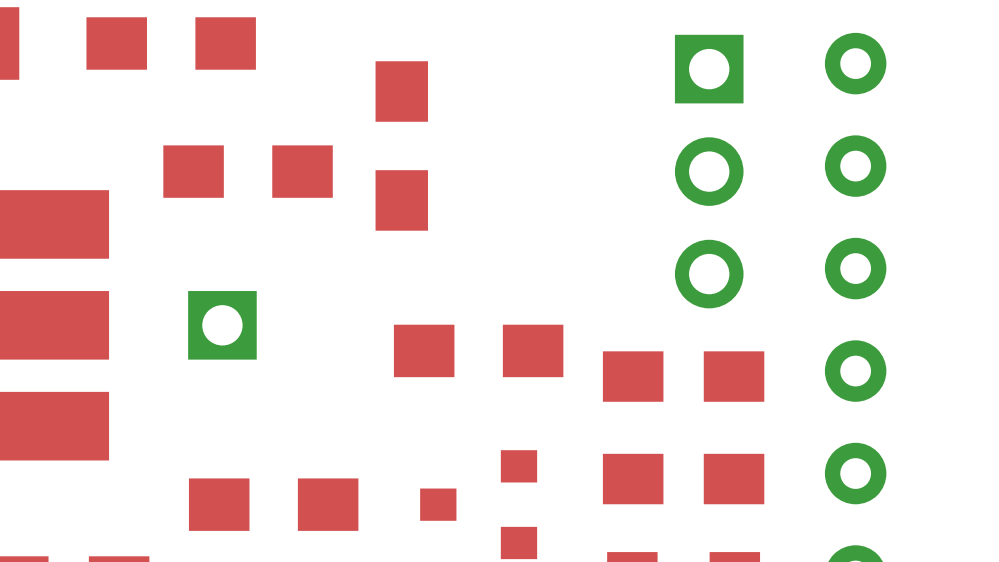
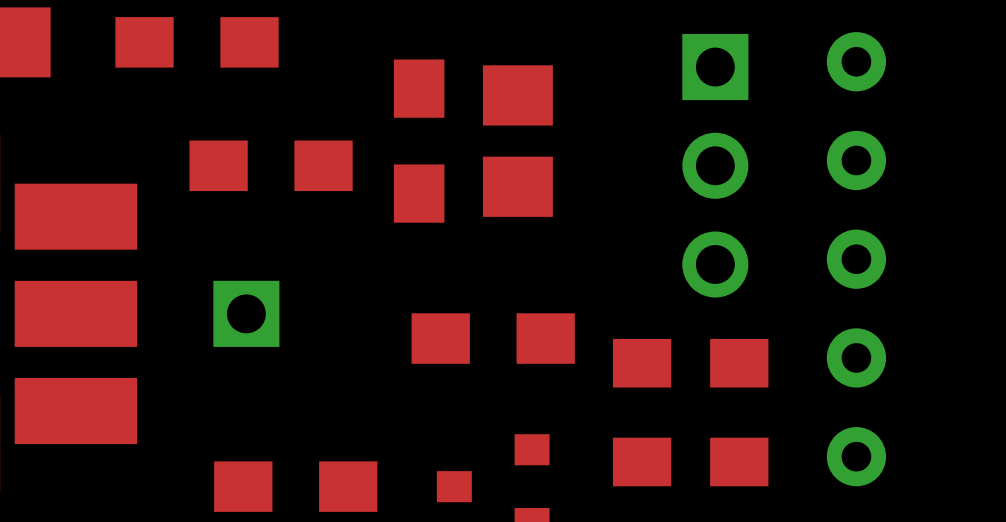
part: none -> (517, 141)

